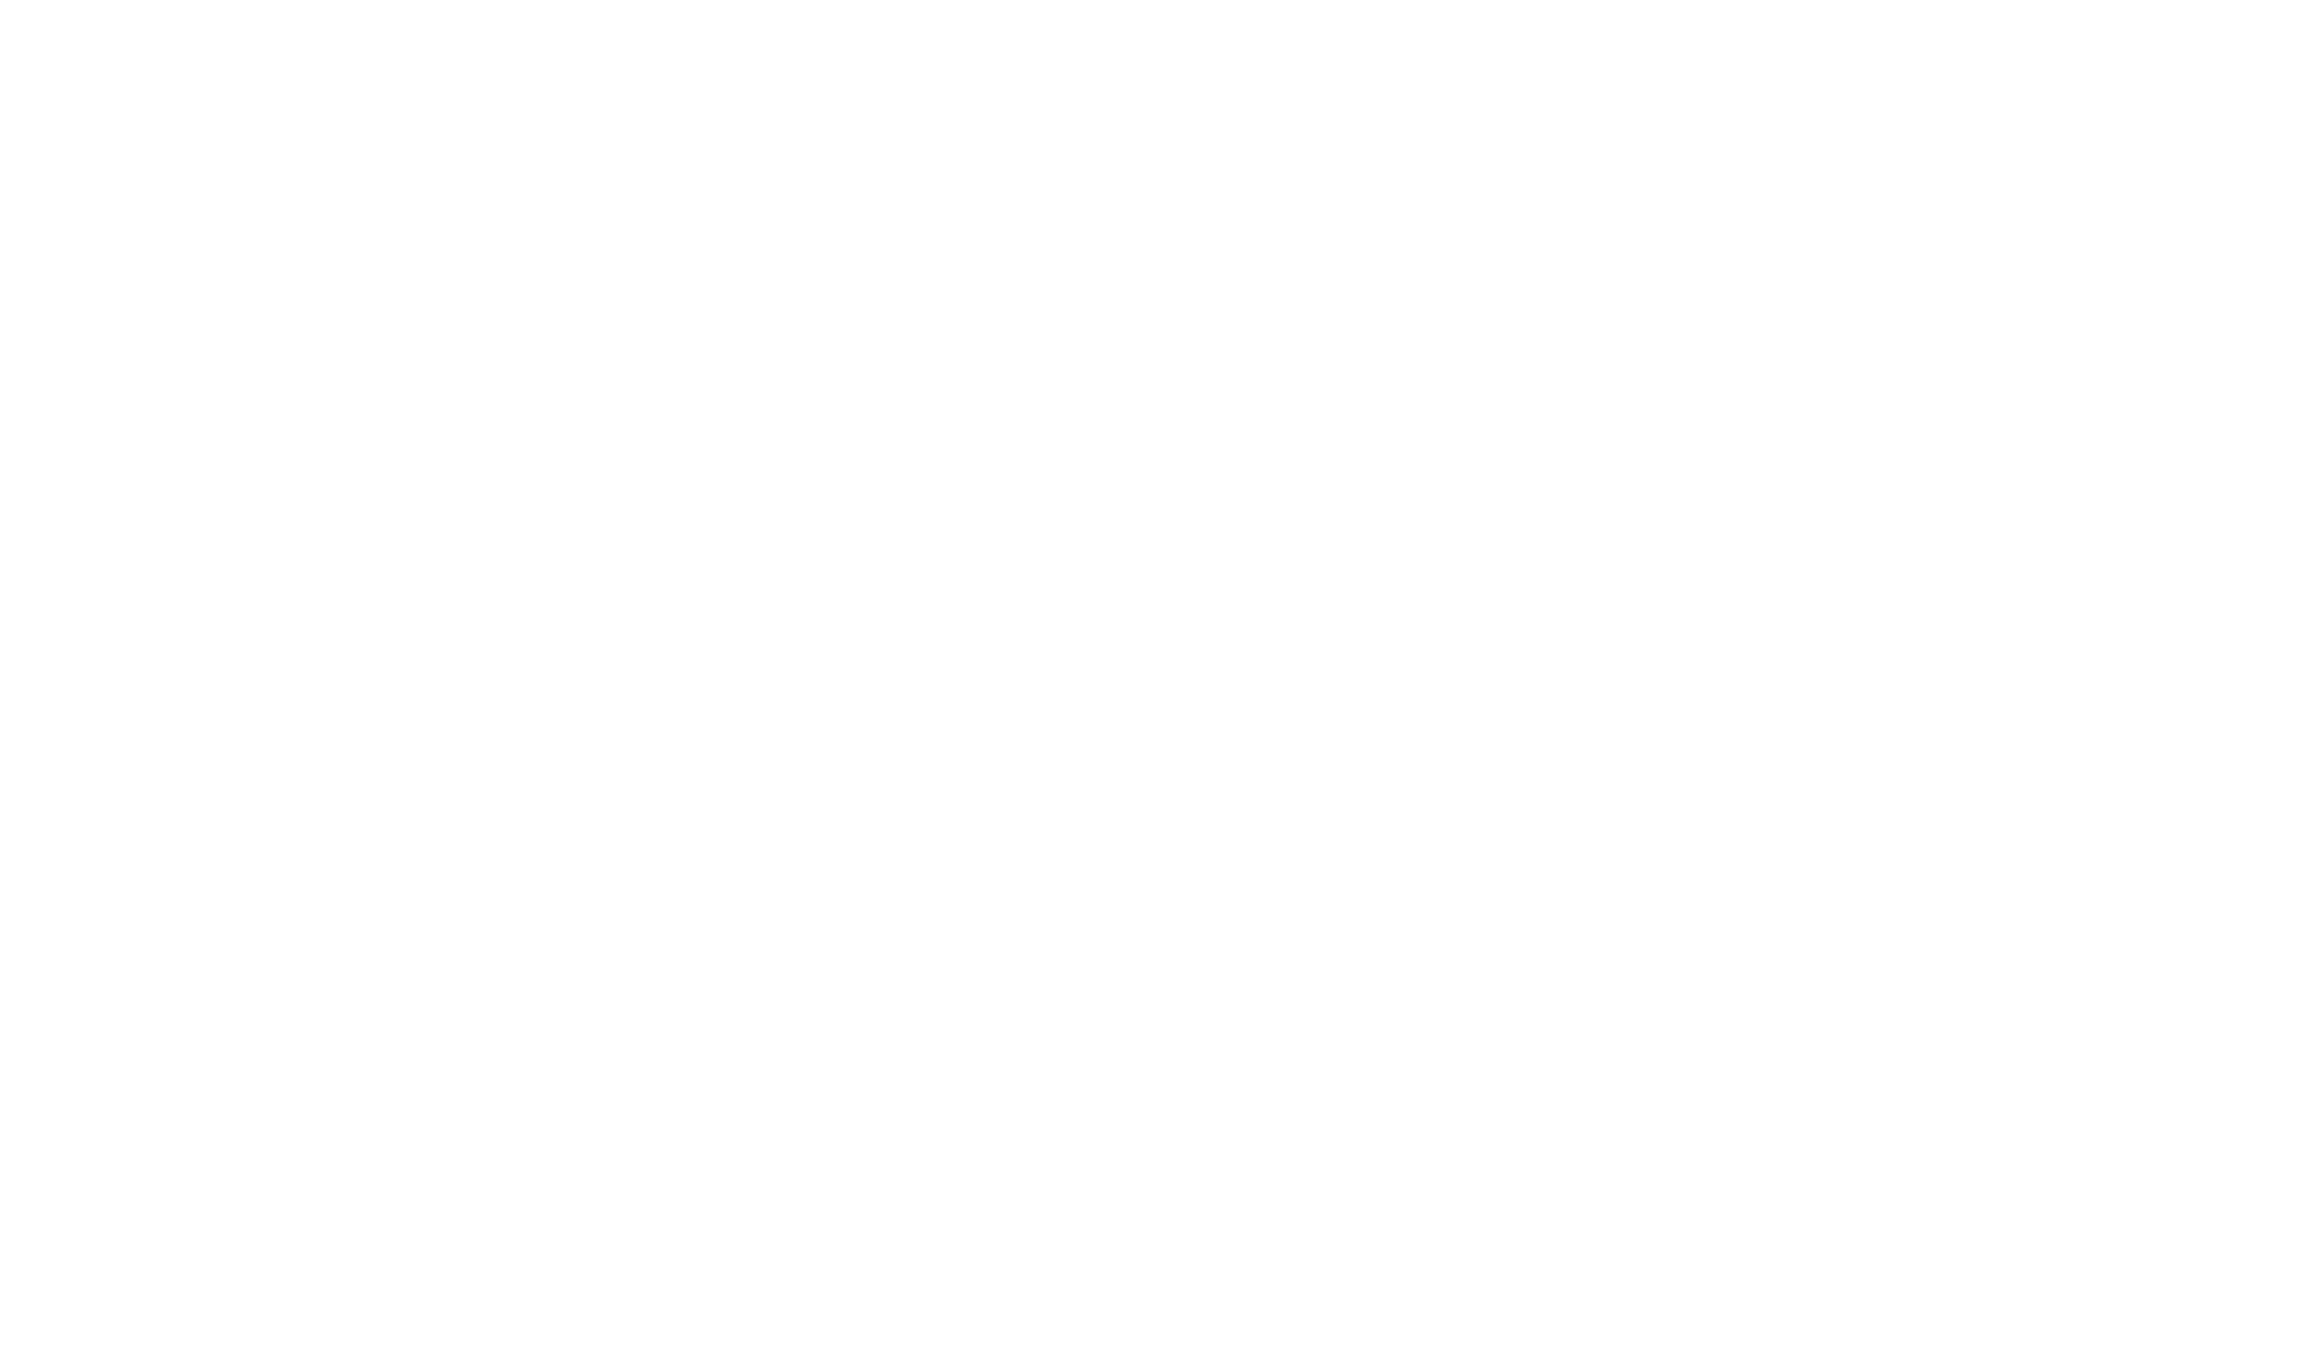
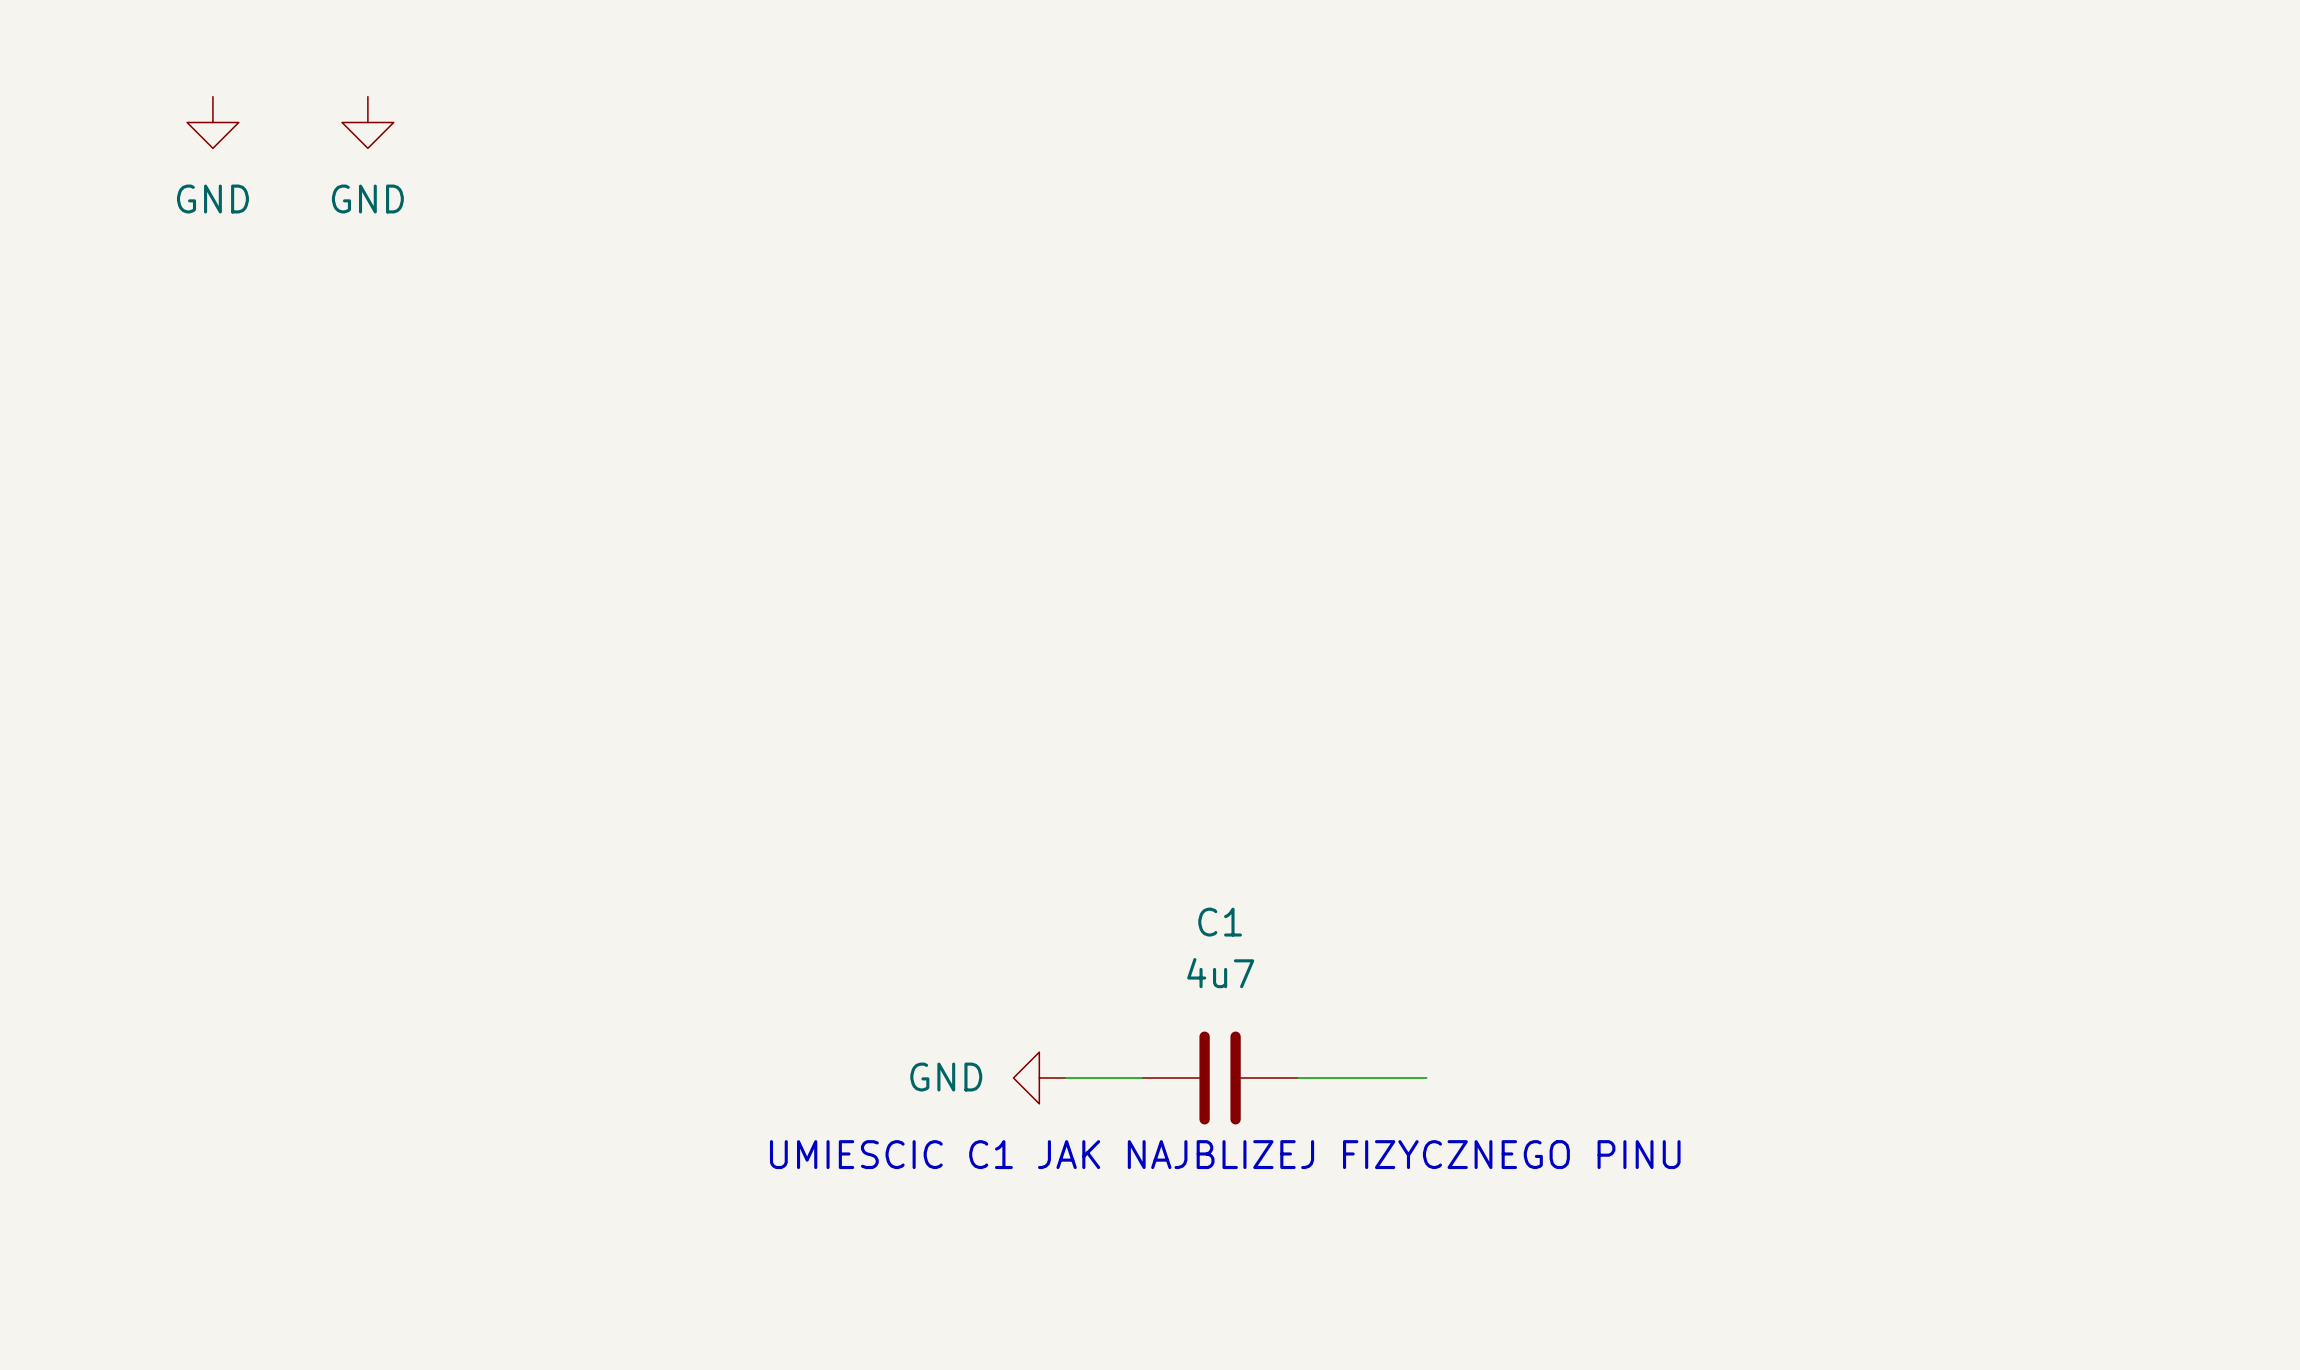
power symbol: none -> GND (212, 122)
power symbol: none -> GND (367, 122)
power symbol: none -> GND (1039, 1078)
wire: none -> (1065, 1078) (1142, 1078)
C1: none -> 4u7 (1220, 1078)
wire: none -> (1297, 1078) (1426, 1078)
text: none -> UMIESCIC C1 JAK NAJBLIZEJ FIZYCZNEGO PINU (1225, 1154)

